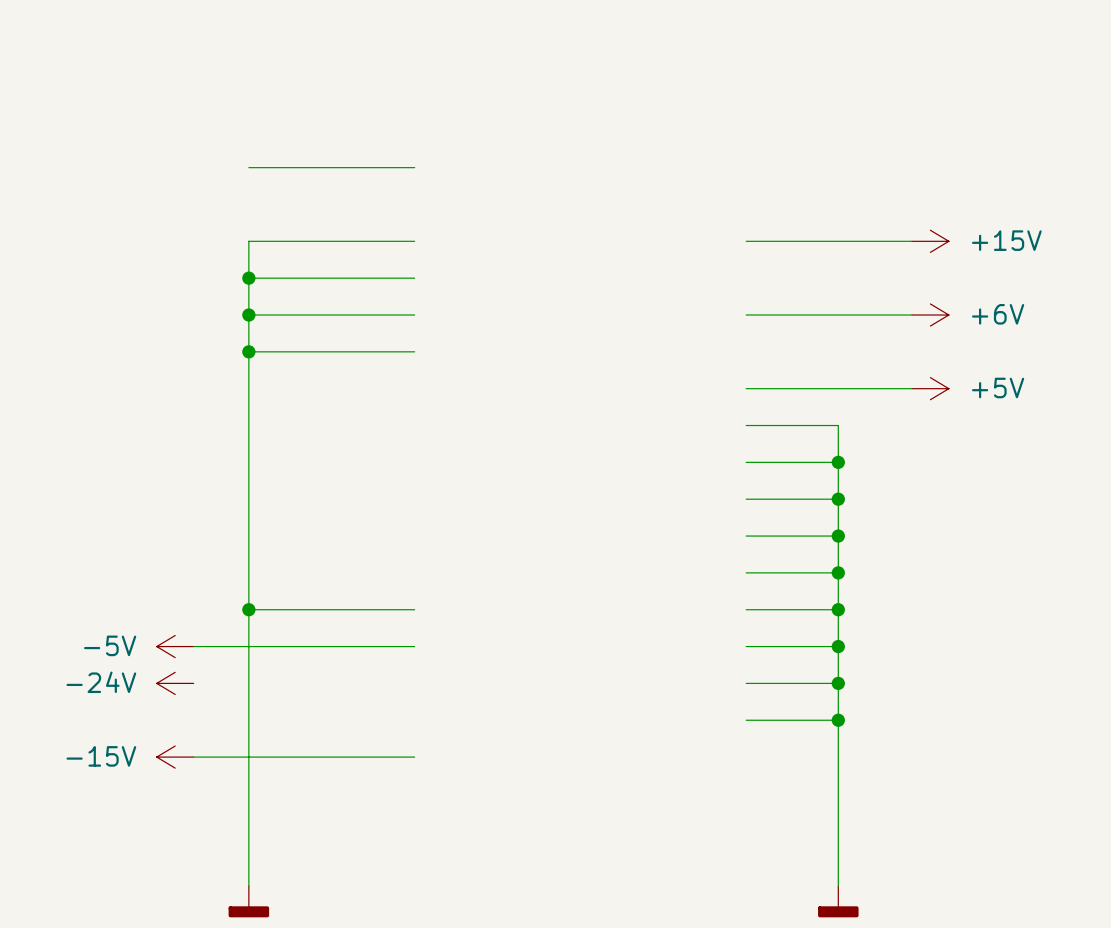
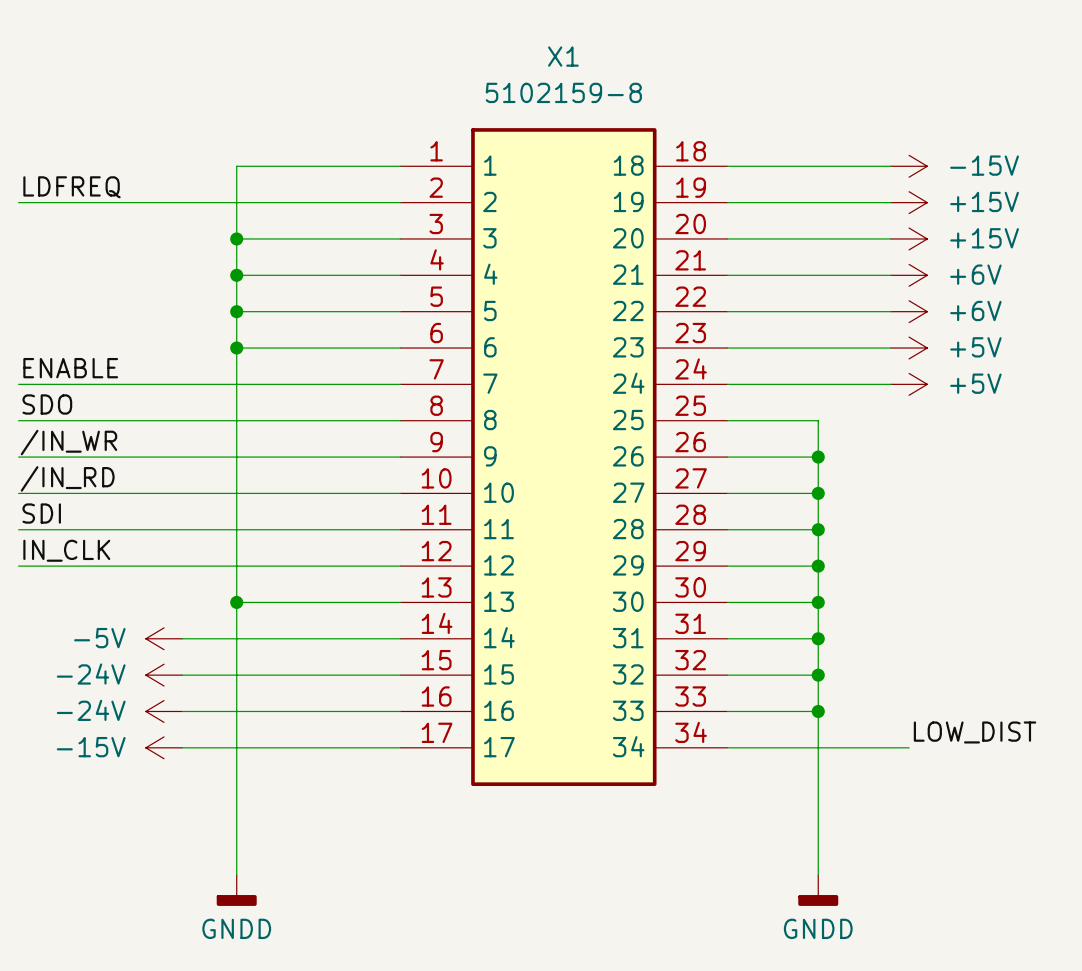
wire: none -> (236, 166) (236, 238)
wire: none -> (727, 166) (890, 166)
power symbol: none -> -15V (909, 166)
label: none -> LDFREQ (72, 187)
wire: none -> (18, 202) (400, 202)
wire: none -> (727, 202) (890, 202)
power symbol: none -> +15V (909, 202)
junction: none -> (236, 238)
wire: none -> (727, 275) (890, 275)
power symbol: none -> +6V (909, 275)
wire: none -> (727, 348) (890, 348)
power symbol: none -> +5V (909, 348)
label: none -> ENABLE (70, 368)
wire: none -> (18, 384) (400, 384)
label: none -> SDO (47, 404)
wire: none -> (18, 420) (400, 420)
label: none -> /IN_WR (68, 442)
wire: none -> (18, 457) (400, 457)
X1: none -> 5102159-8 (563, 457)
label: none -> /IN_RD (67, 478)
wire: none -> (18, 493) (400, 493)
label: none -> SDI (41, 513)
wire: none -> (18, 529) (400, 529)
label: none -> IN_CLK (66, 550)
wire: none -> (18, 566) (400, 566)
wire: none -> (182, 675) (400, 675)
power symbol: none -> -24V (164, 711)
wire: none -> (182, 711) (400, 711)
label: none -> LOW_DIST (975, 732)
wire: none -> (727, 747) (909, 747)

